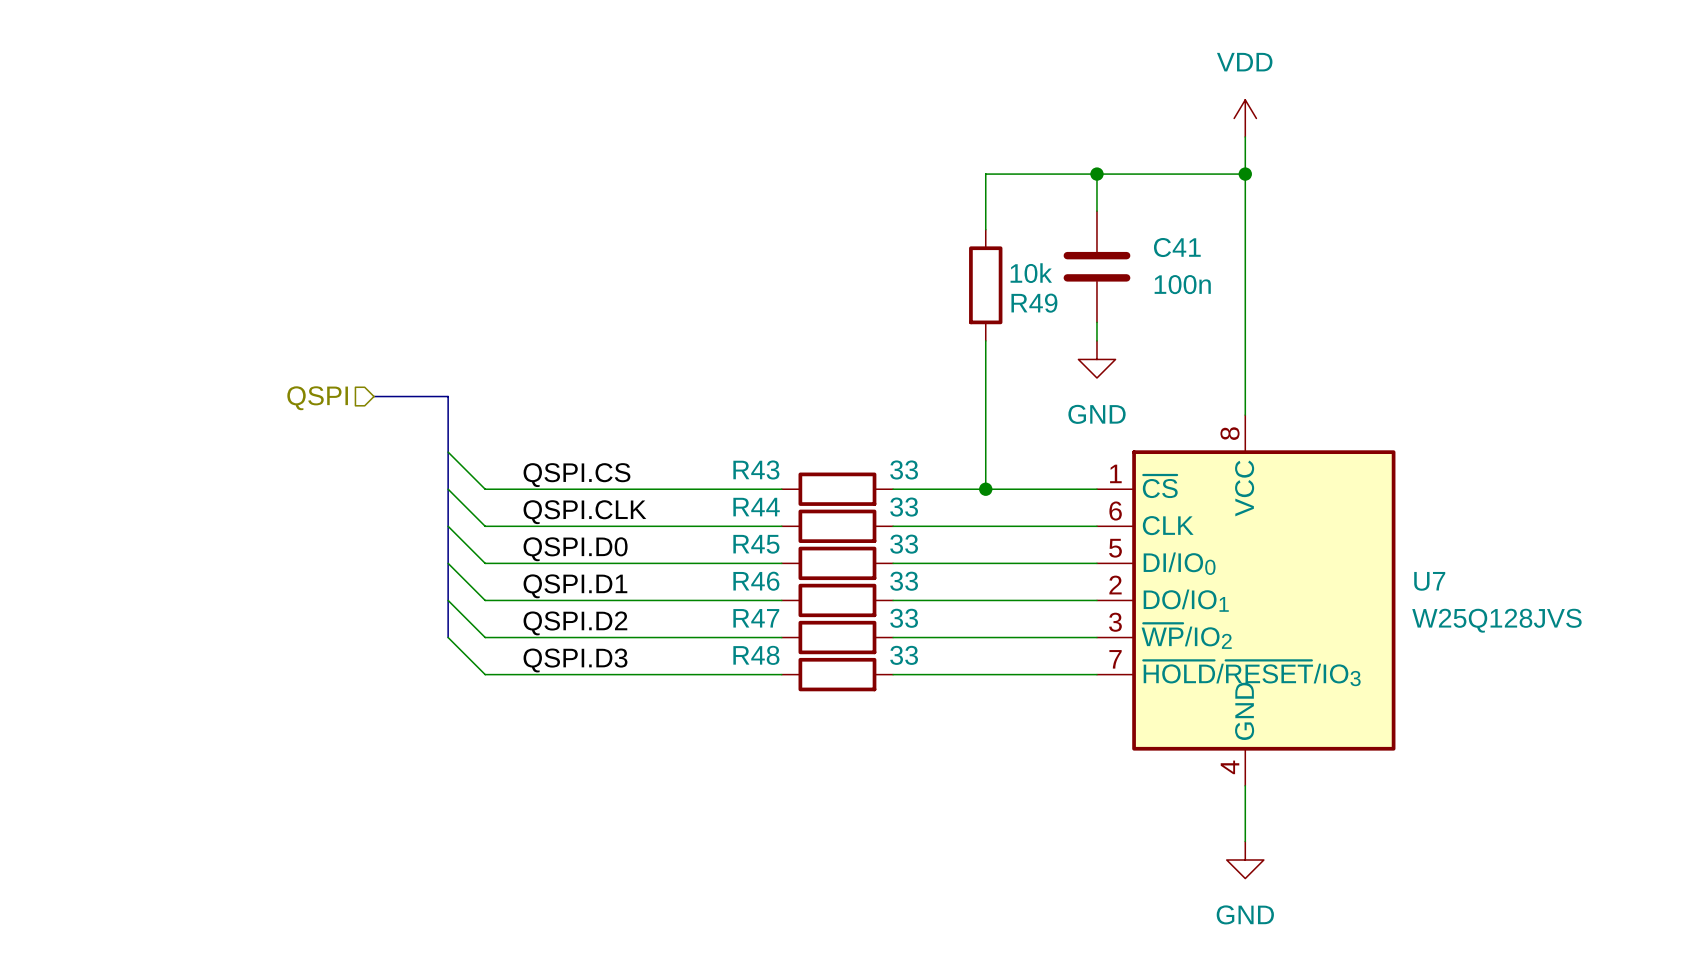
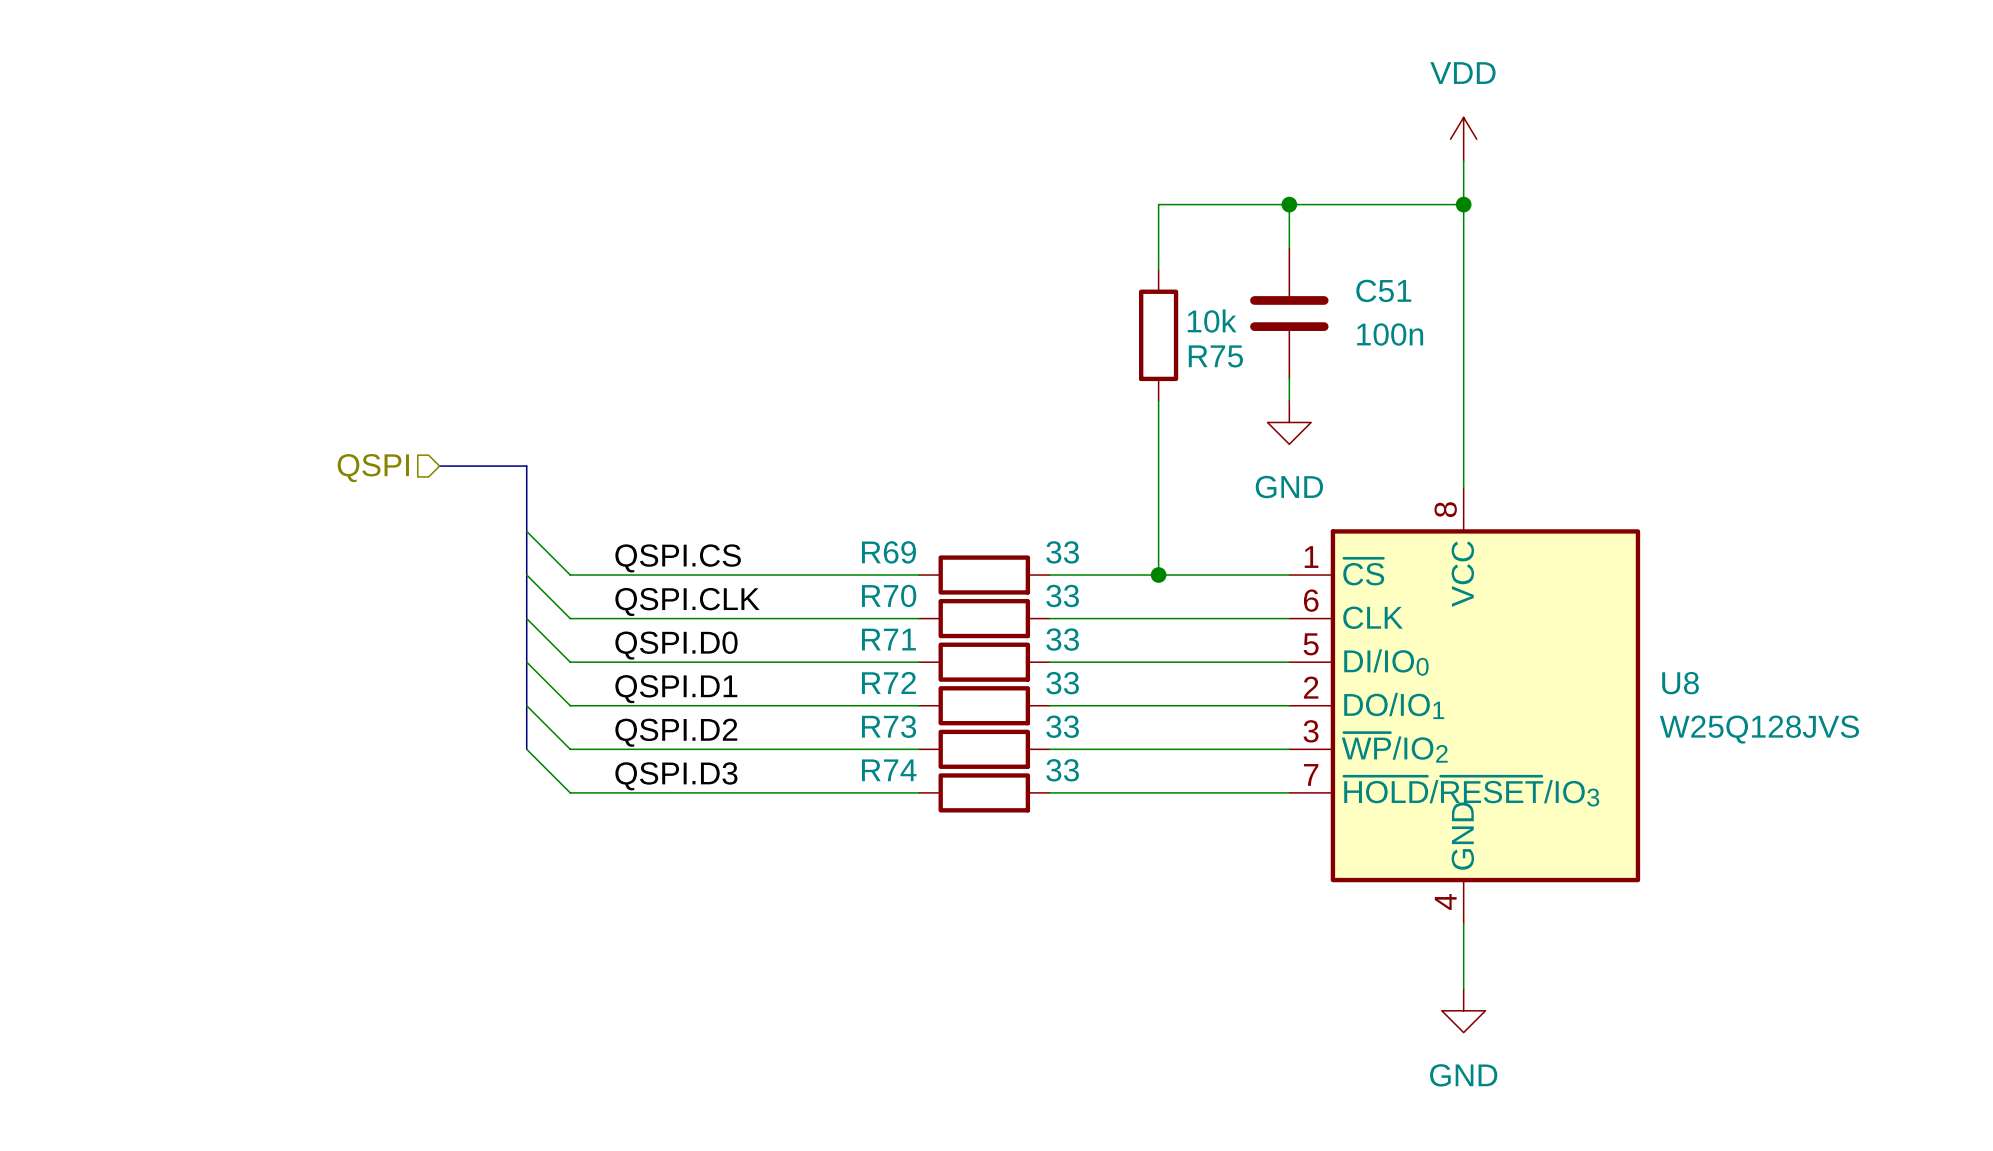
C41 name: C41 (1177, 247) -> C51 (1383, 290)
R49 name: R49 (1034, 303) -> R75 (1215, 356)
R43 name: R43 (756, 469) -> R69 (888, 552)
R44 name: R44 (756, 507) -> R70 (889, 595)
R45 name: R45 (756, 544) -> R71 (888, 639)
R46 name: R46 (756, 581) -> R72 (888, 682)
U7 name: U7 (1429, 581) -> U8 (1680, 683)
R47 name: R47 (756, 618) -> R73 (889, 726)
R48 name: R48 (756, 655) -> R74 (889, 770)

